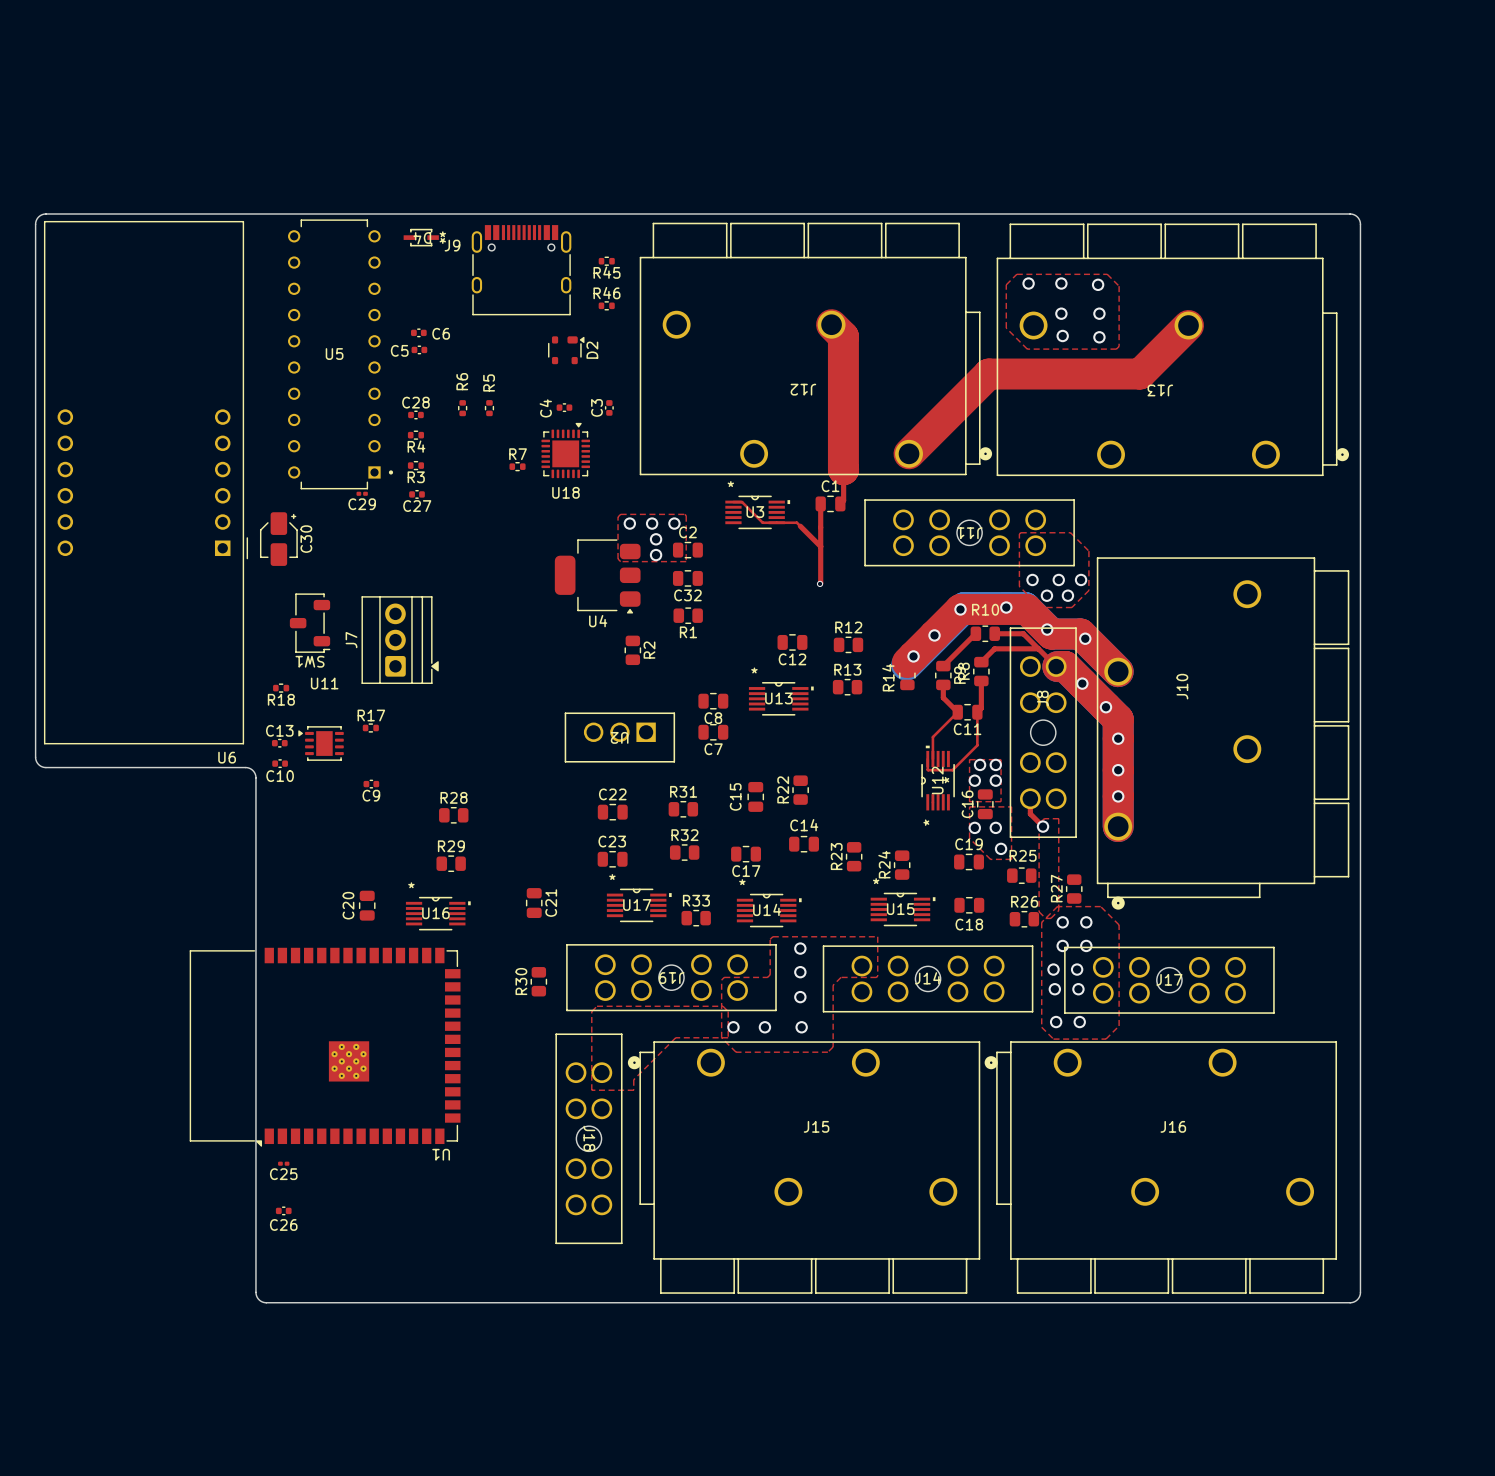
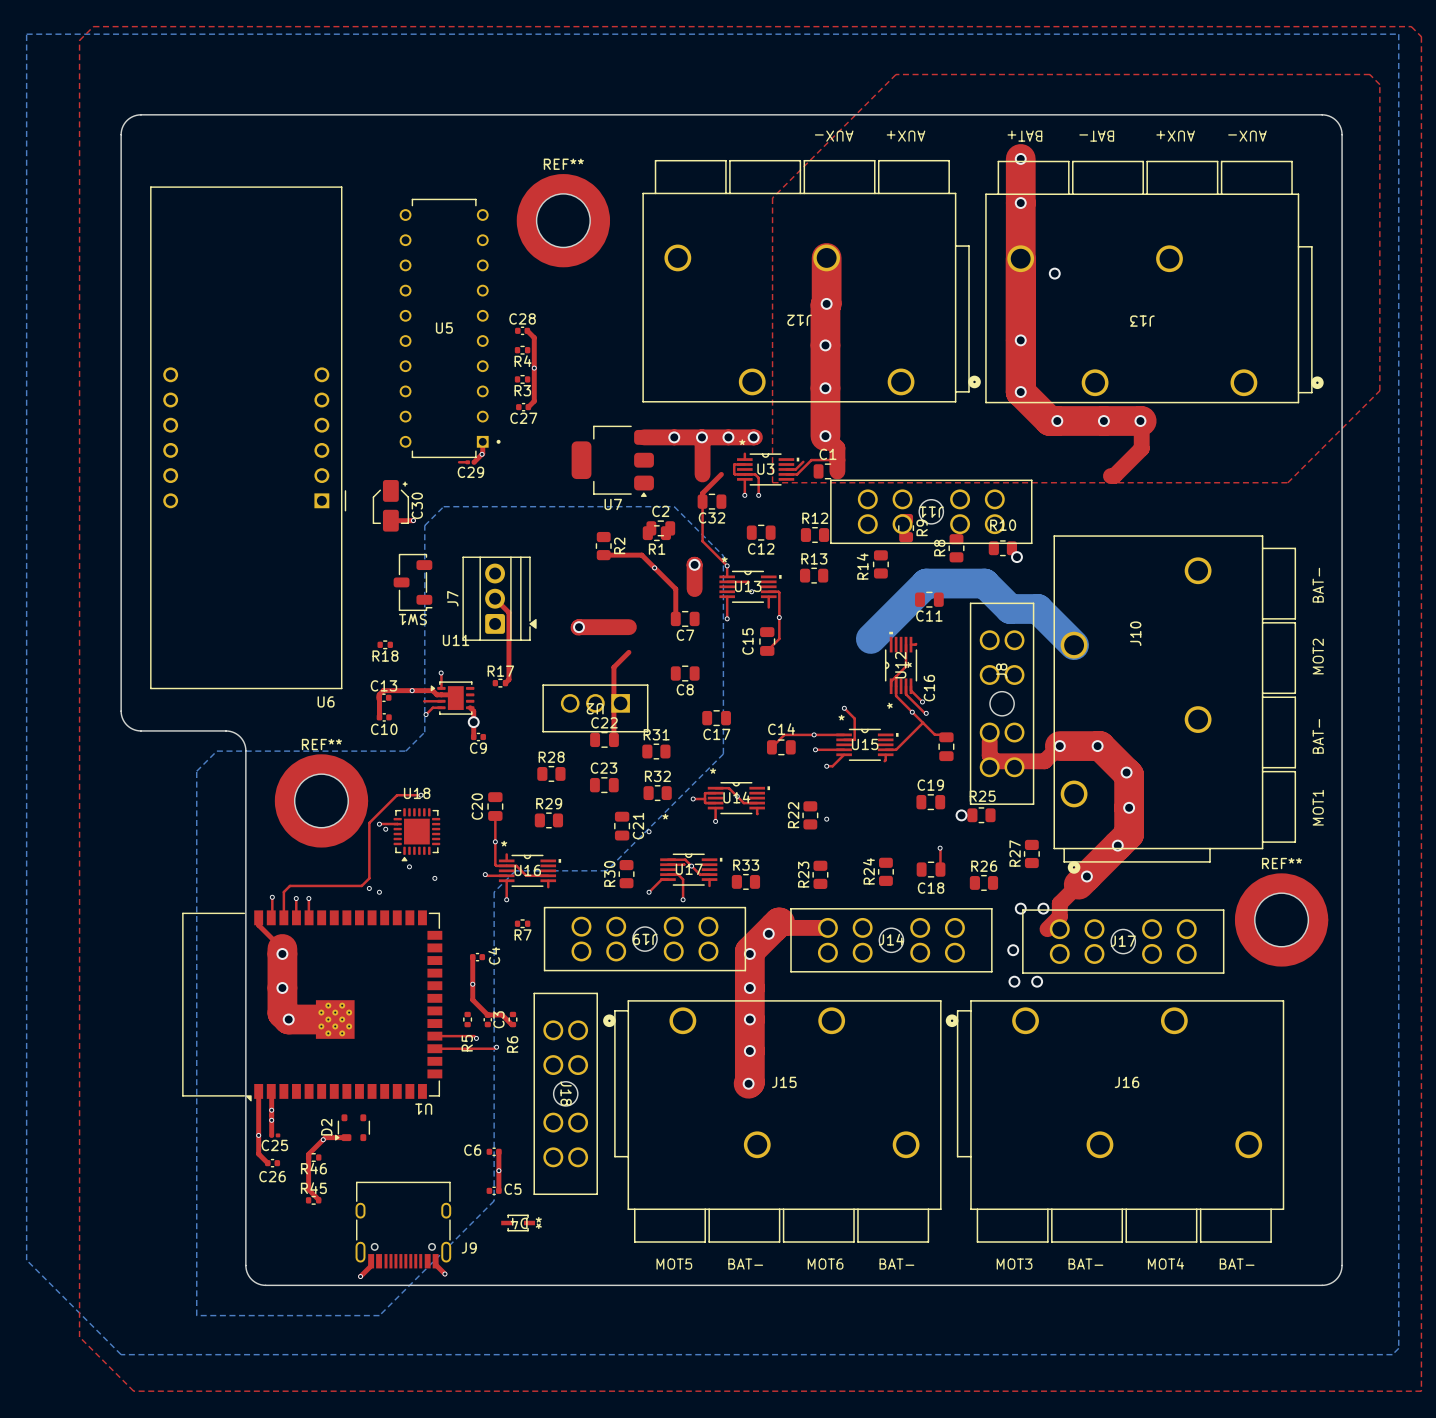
top zone outline: none -> (93, 26) (1411, 26) (1421, 36) (1421, 1391) (133, 1391) (79, 1337) (79, 40) (93, 26)
bottom zone outline: none -> (26, 34) (1398, 34) (1398, 1348) (1392, 1354) (121, 1354) (26, 1260) (26, 34)
top zone outline: none -> (896, 74) (1369, 74) (1379, 84) (1379, 390) (1287, 482) (772, 482) (772, 197) (896, 74)
text: none -> AUX- (834, 136)
text: none -> AUX+ (906, 136)
text: none -> BAT+ (1024, 136)
text: none -> BAT- (1096, 136)
text: none -> AUX+ (1175, 136)
text: none -> AUX- (1247, 136)
top track: none -> (1020, 158) (1020, 392)
via: none -> (1020, 158)
via: none -> (1020, 203)
REF**: none -> (563, 220)
D4 position: (421, 237) -> (518, 1223)
R45 position: (606, 261) -> (313, 1200)
top track: none -> (826, 257) (825, 436) (837, 448) (837, 471)
J9 rotation: 0° (521, 270) -> 180° (403, 1225)
J9 position: (521, 270) -> (403, 1225)
R45 name position: R45 (607, 272) -> R45 (313, 1188)
top zone outline: (1016, 274) (1107, 274) (1119, 286) (1119, 346) (1116, 349) (1027, 349) (1006, 328) (1006, 284) (1016, 274) -> none
via: (1028, 283) -> none
via: (1061, 283) -> none
R46 name position: R46 (606, 293) -> R46 (313, 1168)
R46 position: (606, 305) -> (313, 1157)
via: (1061, 313) -> none
via: (1099, 313) -> none
via: none -> (826, 303)
top track: (831, 324) (843, 336) (843, 500) (840, 503) -> none
top track: (1188, 325) (1140, 374) (988, 374) (909, 453) -> none
C6 position: (418, 332) -> (494, 1151)
C6 name position: C6 (441, 333) -> C6 (472, 1150)
via position: (1062, 335) -> (1020, 340)
via: (1099, 337) -> none
top track: none -> (527, 330) (534, 337) (534, 401) (528, 407)
J12 position: (815, 348) -> (811, 281)
C5 position: (419, 349) -> (494, 1190)
J13 position: (1172, 349) -> (1154, 282)
C5 name position: C5 (399, 350) -> C5 (513, 1189)
D2 rotation: 0° (566, 350) -> 180° (352, 1127)
D2 position: (566, 350) -> (352, 1127)
U5 position: (340, 354) -> (450, 328)
via: none -> (825, 345)
R6 name position: R6 (462, 381) -> R6 (512, 1044)
R5 name position: R5 (489, 382) -> R5 (467, 1043)
via: none -> (534, 368)
via: none -> (825, 388)
C4 position: (564, 407) -> (477, 957)
C3 name position: C3 (596, 407) -> C3 (498, 1019)
C3 position: (609, 407) -> (487, 1019)
R6 position: (462, 408) -> (512, 1019)
R5 position: (489, 408) -> (467, 1019)
C4 name position: C4 (545, 408) -> C4 (494, 955)
top track: none -> (1020, 391) (1049, 421) (1141, 421) (1141, 448) (1114, 476) (1110, 476)
via: none -> (1020, 392)
C28 position: (415, 414) -> (522, 330)
R4 position: (415, 435) -> (522, 350)
via: none -> (1057, 421)
via: none -> (1103, 421)
via: none -> (1140, 421)
U18 rotation: 0° (565, 450) -> 180° (416, 834)
U18 position: (565, 450) -> (416, 834)
R7 name position: R7 (518, 454) -> R7 (523, 934)
via: none -> (825, 436)
top track: none -> (644, 437) (754, 437)
via: none -> (674, 437)
top track: none -> (701, 437) (702, 474)
via: none -> (701, 437)
via: none -> (728, 437)
via: none -> (753, 437)
top track: none -> (482, 441) (482, 453) (474, 462)
R3 position: (415, 465) -> (522, 379)
R7 position: (517, 466) -> (522, 923)
top track: none -> (744, 453) (744, 459)
via: none -> (482, 454)
top track: none -> (837, 460) (811, 460) (797, 474) (786, 474)
U7: none -> (612, 461)
top track: none -> (803, 461) (795, 469) (786, 469)
top track: none -> (459, 462) (467, 462)
U6 position: (145, 482) -> (248, 437)
top track: none -> (744, 464) (734, 464) (734, 473) (755, 474) (758, 477) (758, 495)
C29 position: (362, 493) -> (470, 462)
top track: none -> (721, 474) (702, 493) (702, 541) (727, 565) (727, 576)
C27 position: (417, 494) -> (523, 407)
top track: none -> (744, 479) (744, 495)
top track: (733, 502) (742, 502) (762, 522) (796, 522) (820, 546) -> none
top track: (820, 503) (820, 583) -> none
C1 position: (830, 503) -> (827, 471)
U3 position: (757, 512) -> (768, 469)
top zone outline: (620, 514) (618, 517) (618, 558) (620, 561) (686, 561) (684, 514) (620, 514) -> none
via: none -> (744, 495)
via: none -> (758, 495)
via: (629, 523) -> none
via: (652, 523) -> none
via: (674, 523) -> none
bottom zone outline: none -> (443, 506) (424, 525) (424, 732) (405, 751) (216, 751) (196, 771) (196, 1315) (379, 1315) (494, 1200) (494, 892) (515, 870) (606, 870) (723, 754) (723, 555) (674, 506) (443, 506)
top zone outline: (1020, 532) (1019, 586) (1040, 607) (1071, 607) (1088, 590) (1088, 551) (1070, 532) (1020, 532) -> none
C30 position: (278, 539) -> (390, 505)
via: (656, 539) -> none
top track: none -> (413, 520) (390, 520)
via: none -> (413, 520)
via: (656, 555) -> none
U4: (597, 576) -> none
top track: none -> (603, 555) (641, 555) (675, 589) (675, 618)
C32 position: (687, 578) -> (711, 501)
via: (1032, 579) -> none
via: (1081, 579) -> none
via: (820, 583) -> none
top track: none -> (694, 564) (694, 589)
via: none -> (694, 564)
via: none -> (727, 565)
via: none -> (654, 567)
via: (1046, 595) -> none
via: (1067, 595) -> none
top track: none -> (727, 581) (748, 582)
via: (1006, 607) -> none
via: (960, 609) -> none
text: none -> BAT- (1318, 585)
R1 position: (688, 615) -> (656, 533)
via: none -> (751, 591)
top track: none -> (768, 591) (779, 592) (779, 638) (767, 650)
top track: none -> (727, 596) (727, 620)
top track: none -> (768, 596) (768, 607)
SW1 position: (310, 623) -> (413, 582)
top track: none -> (495, 598) (508, 612) (508, 679) (505, 683)
via: (1047, 629) -> none
top track: (975, 633) (943, 666) -> none
R10 position: (985, 633) -> (1002, 548)
top track: (994, 633) (1023, 633) (1056, 666) -> none
via: (934, 635) -> none
via: (1085, 638) -> none
J7 position: (400, 640) -> (499, 598)
C12 position: (792, 642) -> (761, 532)
via: none -> (779, 617)
via: none -> (727, 618)
R12 position: (848, 644) -> (815, 535)
top track: (1038, 648) (994, 648) (981, 662) -> none
R2 position: (632, 650) -> (603, 546)
via: none -> (579, 627)
top track: none -> (628, 627) (578, 627)
via: (913, 656) -> none
top track: (907, 662) (960, 609) (1026, 609) (1051, 634) (1080, 634) (1118, 671) -> none
top track: (1057, 666) (1065, 666) (1118, 719) (1118, 826) -> none
top track: none -> (916, 644) (910, 644)
top track: none -> (906, 644) (906, 666) (891, 681) (891, 686)
R8 position: (981, 671) -> (956, 548)
R14 position: (907, 675) -> (880, 564)
R9 position: (943, 675) -> (906, 528)
top track: none -> (628, 652) (613, 667) (613, 739)
top track: (981, 680) (981, 708) (977, 712) (977, 745) (952, 770) (928, 770) (927, 759) -> none
via: (1082, 683) -> none
text: none -> MOT2 (1318, 656)
top track: (943, 684) (943, 697) (957, 712) (932, 737) (932, 759) -> none
J10 name position: J10 (1182, 686) -> J10 (1135, 633)
R13 position: (847, 687) -> (814, 575)
R18 position: (281, 688) -> (385, 644)
U13 position: (781, 698) -> (750, 586)
top track: none -> (441, 673) (441, 688)
via: none -> (441, 673)
top track: none -> (896, 676) (896, 695) (934, 734) (946, 734) (946, 737)
via: (1105, 707) -> none
C11 position: (967, 712) -> (929, 599)
top track: none -> (906, 686) (906, 694) (926, 713)
top track: none -> (910, 686) (910, 690) (922, 701)
via: none -> (412, 690)
top track: none -> (455, 698) (452, 694) (436, 694) (432, 690) (383, 690) (379, 694) (379, 717)
R17 position: (370, 727) -> (500, 683)
top track: none -> (424, 701) (441, 701)
via: none -> (922, 701)
C7 position: (713, 732) -> (685, 618)
top track: none -> (441, 707) (432, 707) (426, 714)
top track: none -> (470, 707) (473, 711) (473, 737)
top track: none -> (844, 708) (854, 718) (854, 739) (844, 739)
via: none -> (844, 708)
via: (1118, 738) -> none
via: none -> (912, 712)
via: none -> (926, 713)
C13 position: (279, 743) -> (383, 697)
U11 position: (321, 743) -> (452, 698)
via: none -> (426, 714)
via: none -> (473, 722)
top track: none -> (923, 722) (896, 749) (885, 749)
top zone outline: (969, 759) (969, 801) (1001, 801) (1001, 759) (969, 759) -> none
C10 position: (280, 763) -> (384, 717)
via: (980, 764) -> none
via: (995, 764) -> none
via: none -> (814, 734)
top track: none -> (844, 734) (784, 734) (771, 747)
text: none -> BAT- (1318, 736)
via: (1118, 770) -> none
top track: none -> (989, 741) (989, 755) (995, 761) (1044, 761) (1059, 746) (1100, 746) (1129, 775) (1129, 834) (1059, 903) (1059, 916) (1047, 929)
via: none -> (1059, 746)
via: none -> (1097, 746)
U12 position: (938, 778) -> (901, 662)
top track: none -> (815, 749) (844, 749)
via: none -> (815, 749)
via: (974, 780) -> none
via: (995, 780) -> none
board edge: (255, 781) (254, 772) (246, 767) (45, 767) (40, 765) (36, 760) (35, 224) (37, 218) (41, 215) (1350, 214) (1355, 215) (1359, 219) (1360, 1292) (1357, 1299) (1350, 1302) (266, 1302) (259, 1299) (255, 1292) -> (245, 750) (241, 738) (230, 731) (138, 730) (126, 725) (121, 715) (121, 134) (123, 126) (130, 117) (140, 114) (1322, 114) (1330, 116) (1339, 124) (1342, 134) (1342, 1265) (1336, 1279) (1322, 1285) (265, 1285) (255, 1282) (247, 1274) (245, 1241)
C9 position: (371, 784) -> (478, 737)
top track: none -> (844, 754) (832, 766) (826, 766)
top track: none -> (885, 754) (884, 761)
R22 position: (800, 790) -> (810, 815)
C15 position: (755, 796) -> (767, 641)
via: (1118, 796) -> none
via: none -> (826, 766)
top track: (1030, 798) (1030, 813) (1043, 826) -> none
C16 name position: C16 (967, 804) -> C16 (929, 688)
C16 position: (985, 804) -> (946, 746)
via: none -> (1126, 772)
top zone outline: (969, 806) (969, 838) (990, 859) (1011, 859) (1011, 806) (969, 806) -> none
R31 position: (683, 809) -> (656, 751)
C22 position: (612, 812) -> (604, 739)
R28 position: (453, 815) -> (551, 773)
top zone outline: (1044, 818) (1058, 818) (1058, 910) (1050, 918) (1045, 918) (1039, 911) (1039, 823) (1044, 818) -> none
top track: none -> (715, 788) (728, 788) (743, 803) (757, 803)
top track: none -> (715, 793) (705, 793) (705, 803) (715, 803)
via: (1043, 826) -> none
top track: none -> (421, 795) (397, 795) (369, 822) (369, 878) (361, 885) (289, 885) (283, 892) (283, 917)
via: none -> (421, 795)
via: (974, 827) -> none
via: (995, 827) -> none
via: none -> (737, 796)
top track: none -> (693, 799) (705, 799)
via: none -> (693, 799)
REF**: none -> (321, 800)
text: none -> MOT1 (1318, 807)
top track: none -> (715, 808) (715, 821)
top track: none -> (757, 808) (757, 814)
via: none -> (1129, 807)
C14 position: (804, 844) -> (781, 747)
top track: none -> (495, 815) (495, 864) (516, 865) (526, 875) (548, 875)
R32 position: (684, 852) -> (657, 793)
via: none -> (826, 819)
C17 position: (746, 854) -> (716, 718)
via: none -> (715, 821)
R23 position: (854, 856) -> (820, 874)
top track: none -> (397, 824) (379, 824)
via: none -> (379, 824)
C23 position: (612, 859) -> (604, 785)
C19 position: (969, 862) -> (930, 802)
via: none -> (385, 829)
R29 position: (451, 863) -> (548, 820)
via: none -> (649, 831)
R24 position: (902, 865) -> (885, 871)
R25 position: (1021, 875) -> (981, 815)
via: none -> (495, 841)
U17 text position: * (612, 877) -> * (665, 816)
via: none -> (1117, 845)
top track: none -> (940, 848) (940, 869)
via: none -> (940, 848)
top track: none -> (506, 854) (506, 860)
top track: none -> (667, 859) (685, 859) (700, 874) (709, 874)
top track: none -> (684, 864) (667, 864)
via: none -> (691, 866)
via: none -> (409, 866)
C21 position: (534, 903) -> (622, 826)
C20 position: (367, 905) -> (495, 806)
U17 position: (639, 905) -> (691, 869)
top zone outline: (1057, 906) (1100, 906) (1119, 924) (1119, 1025) (1105, 1039) (1053, 1039) (1041, 1027) (1041, 922) (1057, 906) -> none
U15 position: (903, 909) -> (867, 744)
top track: none -> (485, 874) (506, 875)
via: none -> (485, 874)
top track: none -> (667, 874) (678, 874) (683, 879) (683, 899)
U14 position: (769, 910) -> (738, 798)
via: none -> (1086, 876)
U16 position: (438, 913) -> (530, 870)
via: none -> (434, 878)
top track: none -> (667, 879) (661, 879) (649, 892)
top track: none -> (709, 879) (709, 885)
top track: none -> (506, 880) (506, 899)
top track: none -> (548, 880) (548, 887)
R33 position: (696, 918) -> (745, 881)
via: (1062, 922) -> none
via: (1086, 922) -> none
via: none -> (369, 888)
via: none -> (379, 892)
via: none -> (649, 892)
top track: none -> (272, 897) (271, 917)
via: none -> (272, 897)
top track: none -> (296, 898) (296, 917)
via: none -> (296, 898)
top track: none -> (308, 898) (309, 917)
via: none -> (308, 898)
via: none -> (506, 899)
via: none -> (683, 899)
top zone outline: (772, 936) (770, 939) (770, 974) (767, 977) (724, 977) (721, 980) (721, 1037) (736, 1052) (827, 1052) (833, 1046) (833, 985) (841, 977) (877, 976) (877, 936) (772, 936) -> none
via: (800, 948) -> none
top track: none -> (258, 917) (258, 925) (282, 948) (282, 1013) (288, 1019) (335, 1019)
REF**: none -> (1281, 919)
top track: none -> (827, 927) (785, 927) (778, 922) (749, 951) (748, 1083)
via: (1053, 969) -> none
via: (1077, 969) -> none
R30 position: (538, 981) -> (626, 874)
via: (1078, 989) -> none
via: none -> (282, 953)
via: none -> (749, 953)
top track: none -> (472, 957) (472, 999) (487, 1014) (502, 1014) (512, 1024)
via: (800, 997) -> none
top zone outline: (597, 1006) (591, 1011) (591, 1090) (633, 1090) (633, 1079) (675, 1037) (728, 1037) (728, 1011) (722, 1006) (597, 1006) -> none
via: none -> (472, 984)
via: (733, 1027) -> none
via: (764, 1027) -> none
via: (801, 1027) -> none
via: none -> (282, 988)
via: none -> (749, 988)
via: none -> (288, 1019)
via: none -> (749, 1019)
top track: none -> (434, 1036) (474, 1036) (476, 1038)
via: none -> (476, 1038)
top track: none -> (496, 1047) (434, 1048)
via: none -> (496, 1047)
via: none -> (749, 1051)
via: none -> (748, 1083)
top track: none -> (258, 1091) (258, 1154) (267, 1163)
top track: none -> (271, 1091) (271, 1135)
via: none -> (271, 1110)
C25 position: (283, 1163) -> (274, 1135)
via: none -> (271, 1120)
via: none -> (258, 1135)
top track: none -> (346, 1137) (325, 1137) (308, 1154) (308, 1189) (318, 1200)
via: none -> (323, 1139)
top track: none -> (498, 1151) (498, 1190)
via: none -> (498, 1170)
top track: none -> (371, 1261) (371, 1265) (360, 1276)
top track: none -> (435, 1261) (435, 1264) (444, 1274)
text: none -> MOT5 (674, 1264)
text: none -> BAT- (745, 1264)
text: none -> MOT6 (825, 1264)
text: none -> BAT- (896, 1264)
text: none -> MOT3 (1014, 1264)
text: none -> BAT- (1085, 1264)
text: none -> MOT4 (1165, 1263)
text: none -> BAT- (1237, 1264)
via: none -> (444, 1274)
via: none -> (360, 1276)

